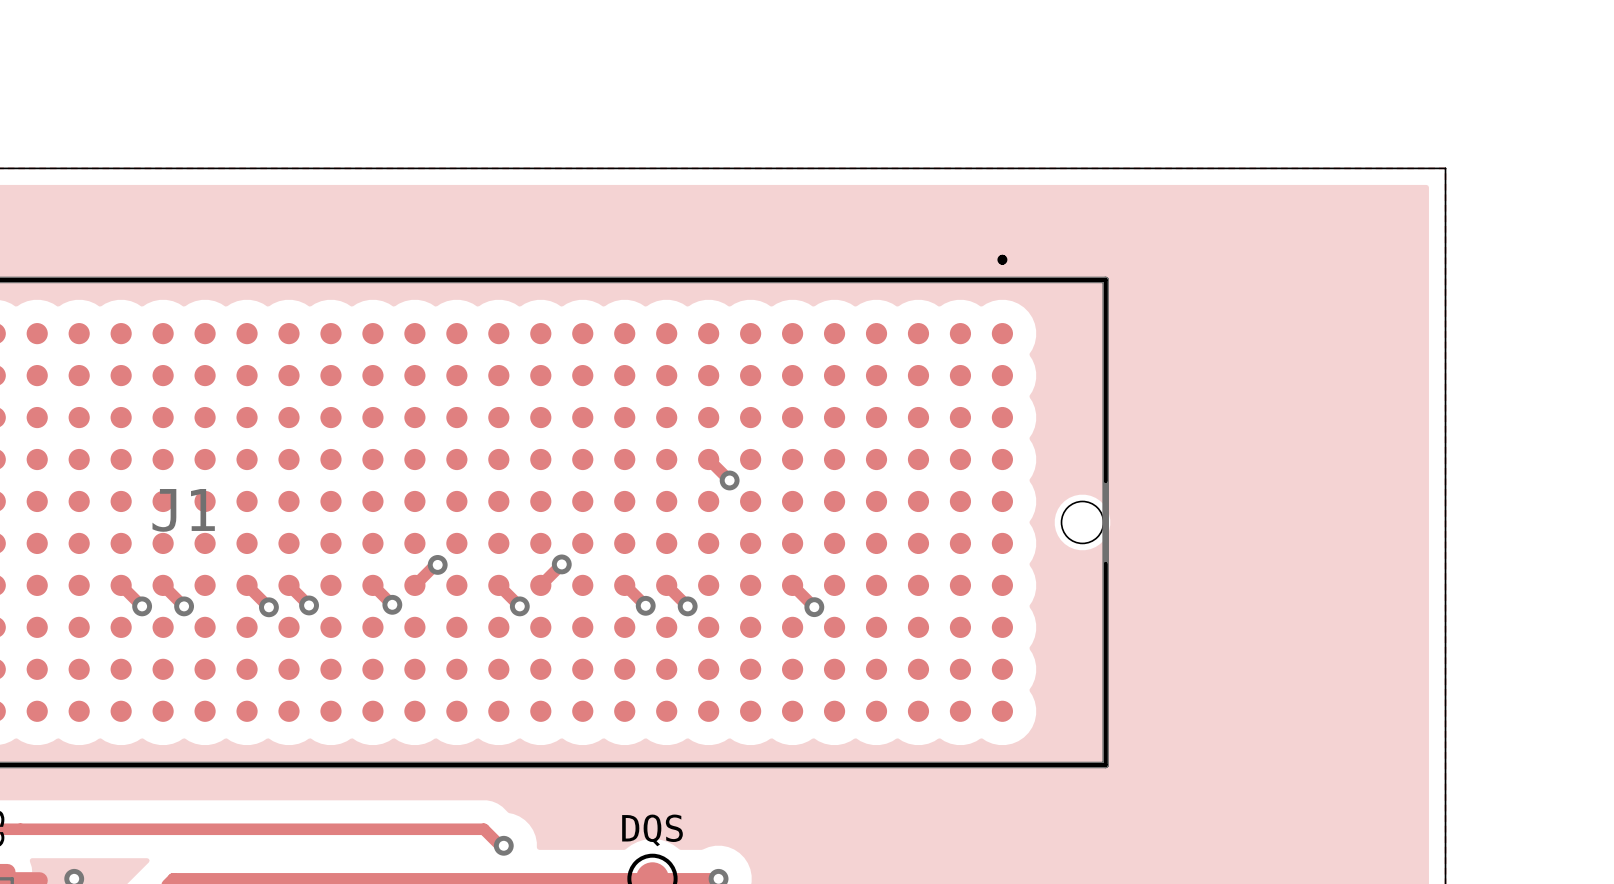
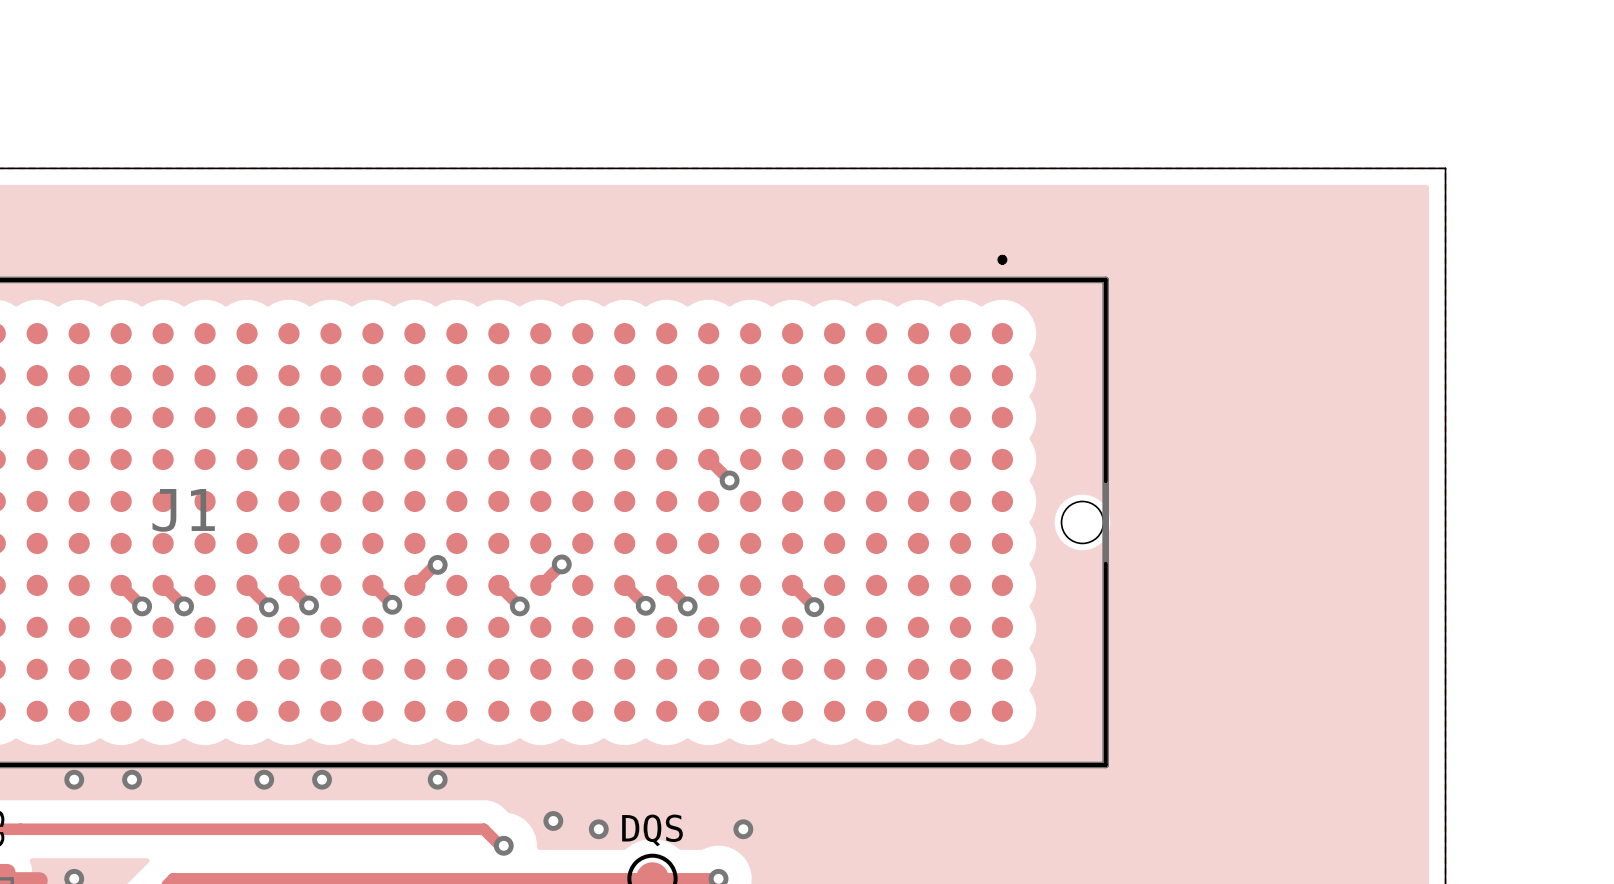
via: none -> (74, 779)
via: none -> (132, 779)
via: none -> (264, 779)
via: none -> (322, 779)
via: none -> (437, 779)
via: none -> (553, 821)
via: none -> (598, 829)
via: none -> (743, 829)

